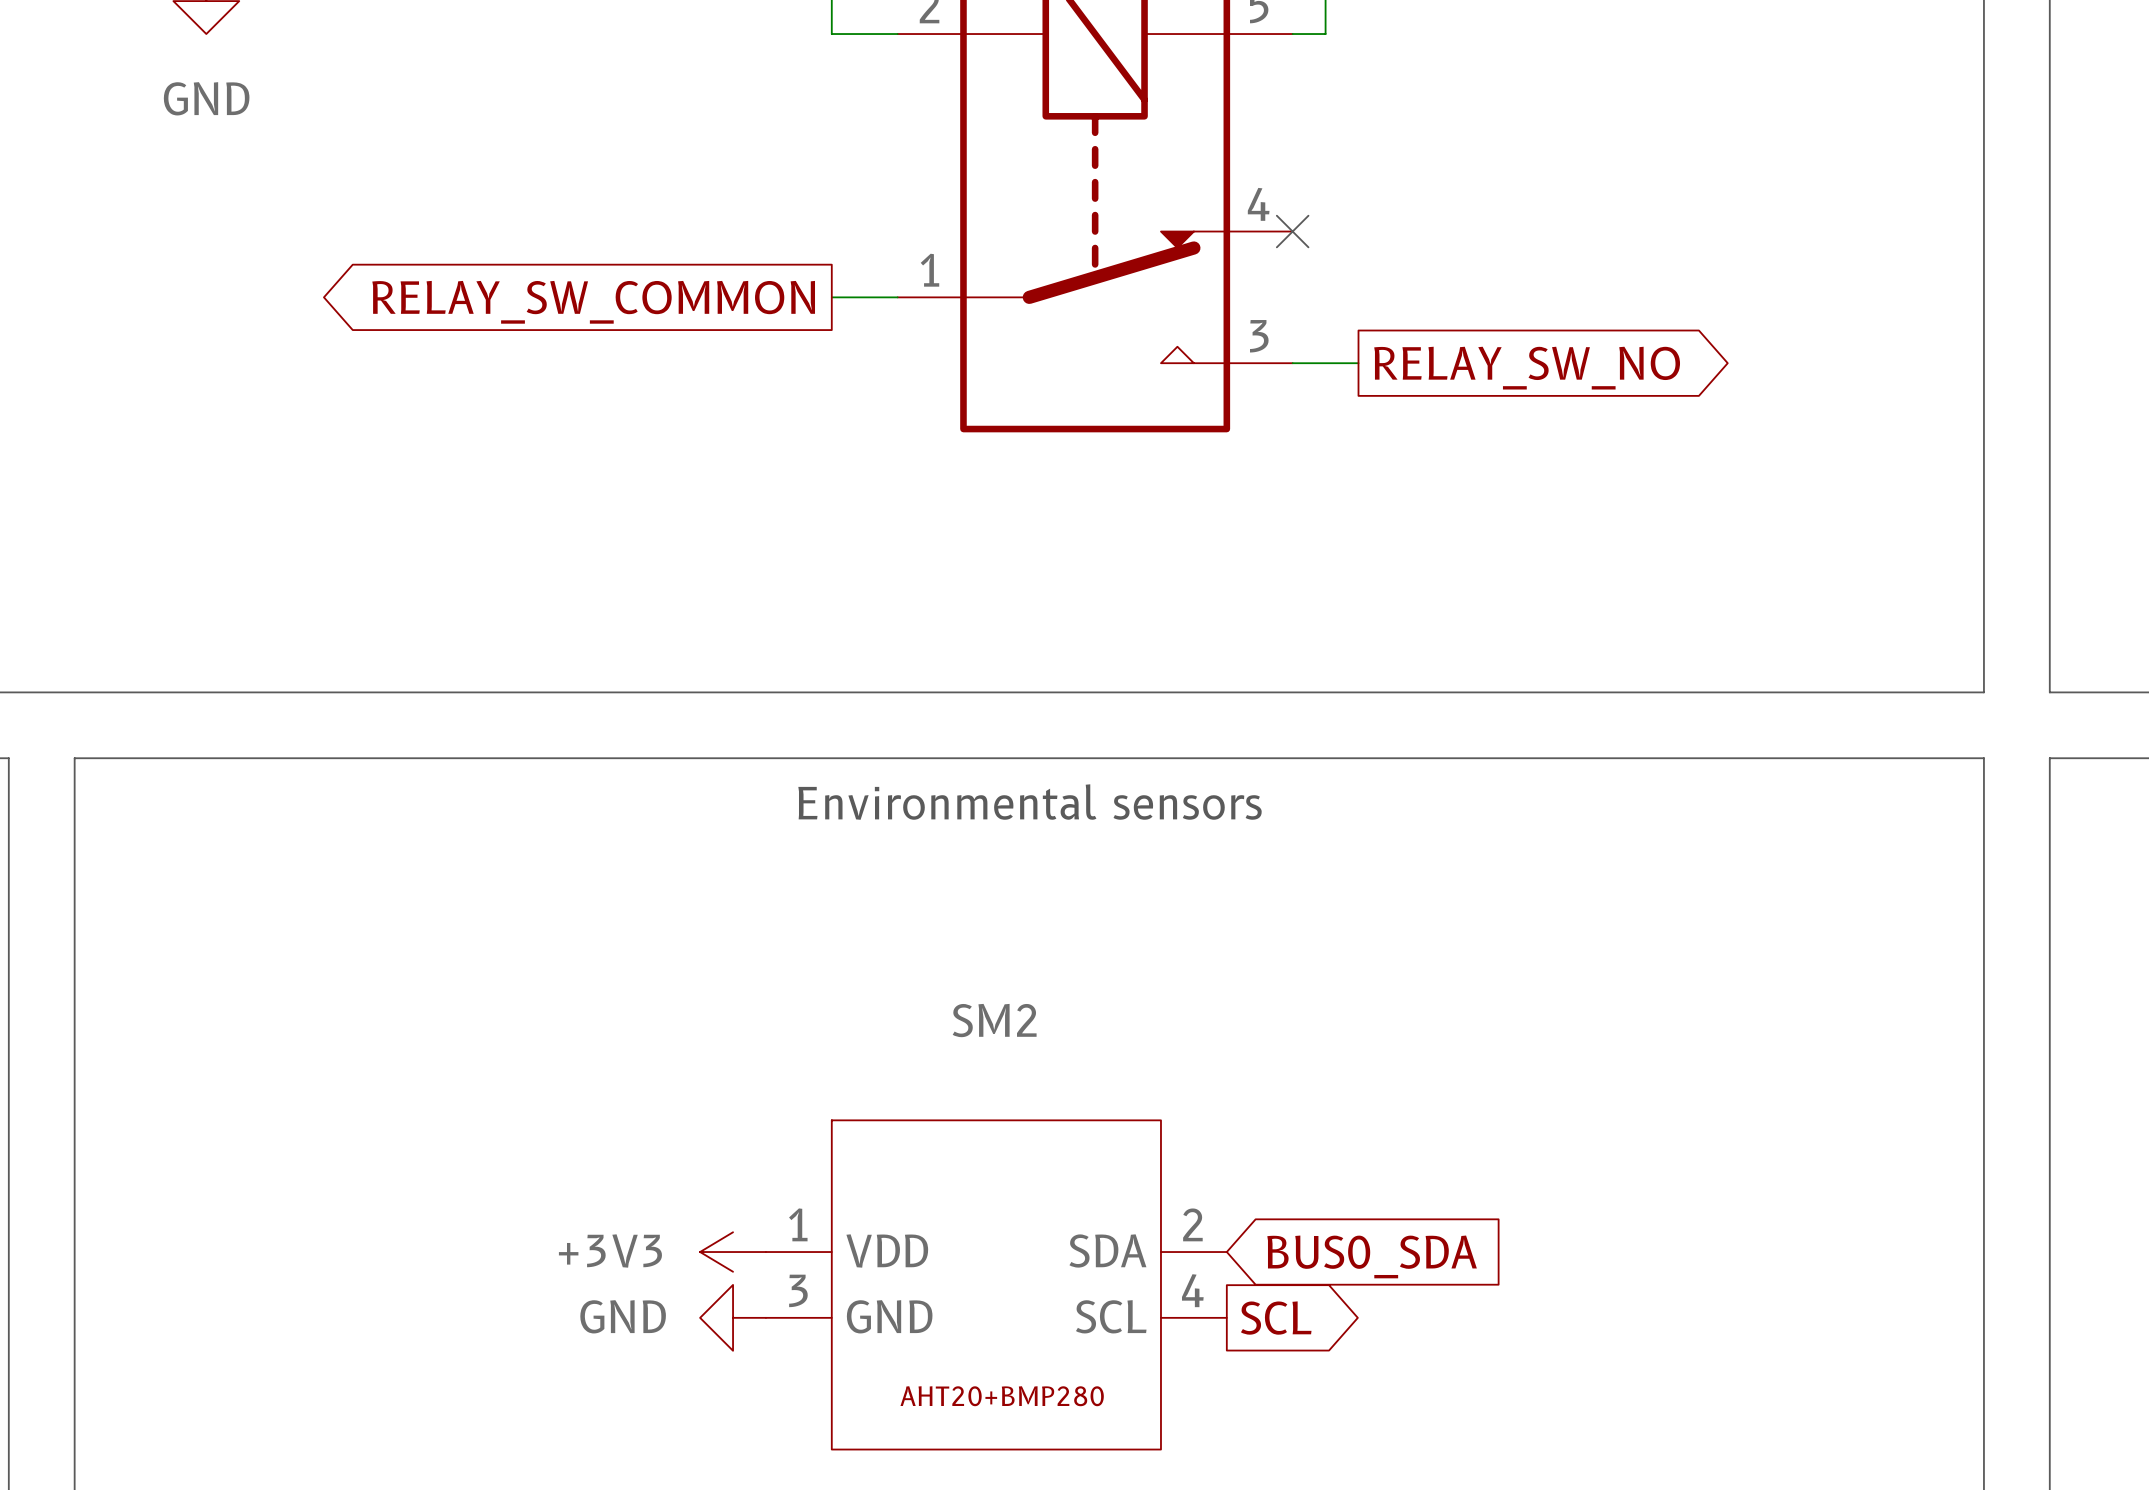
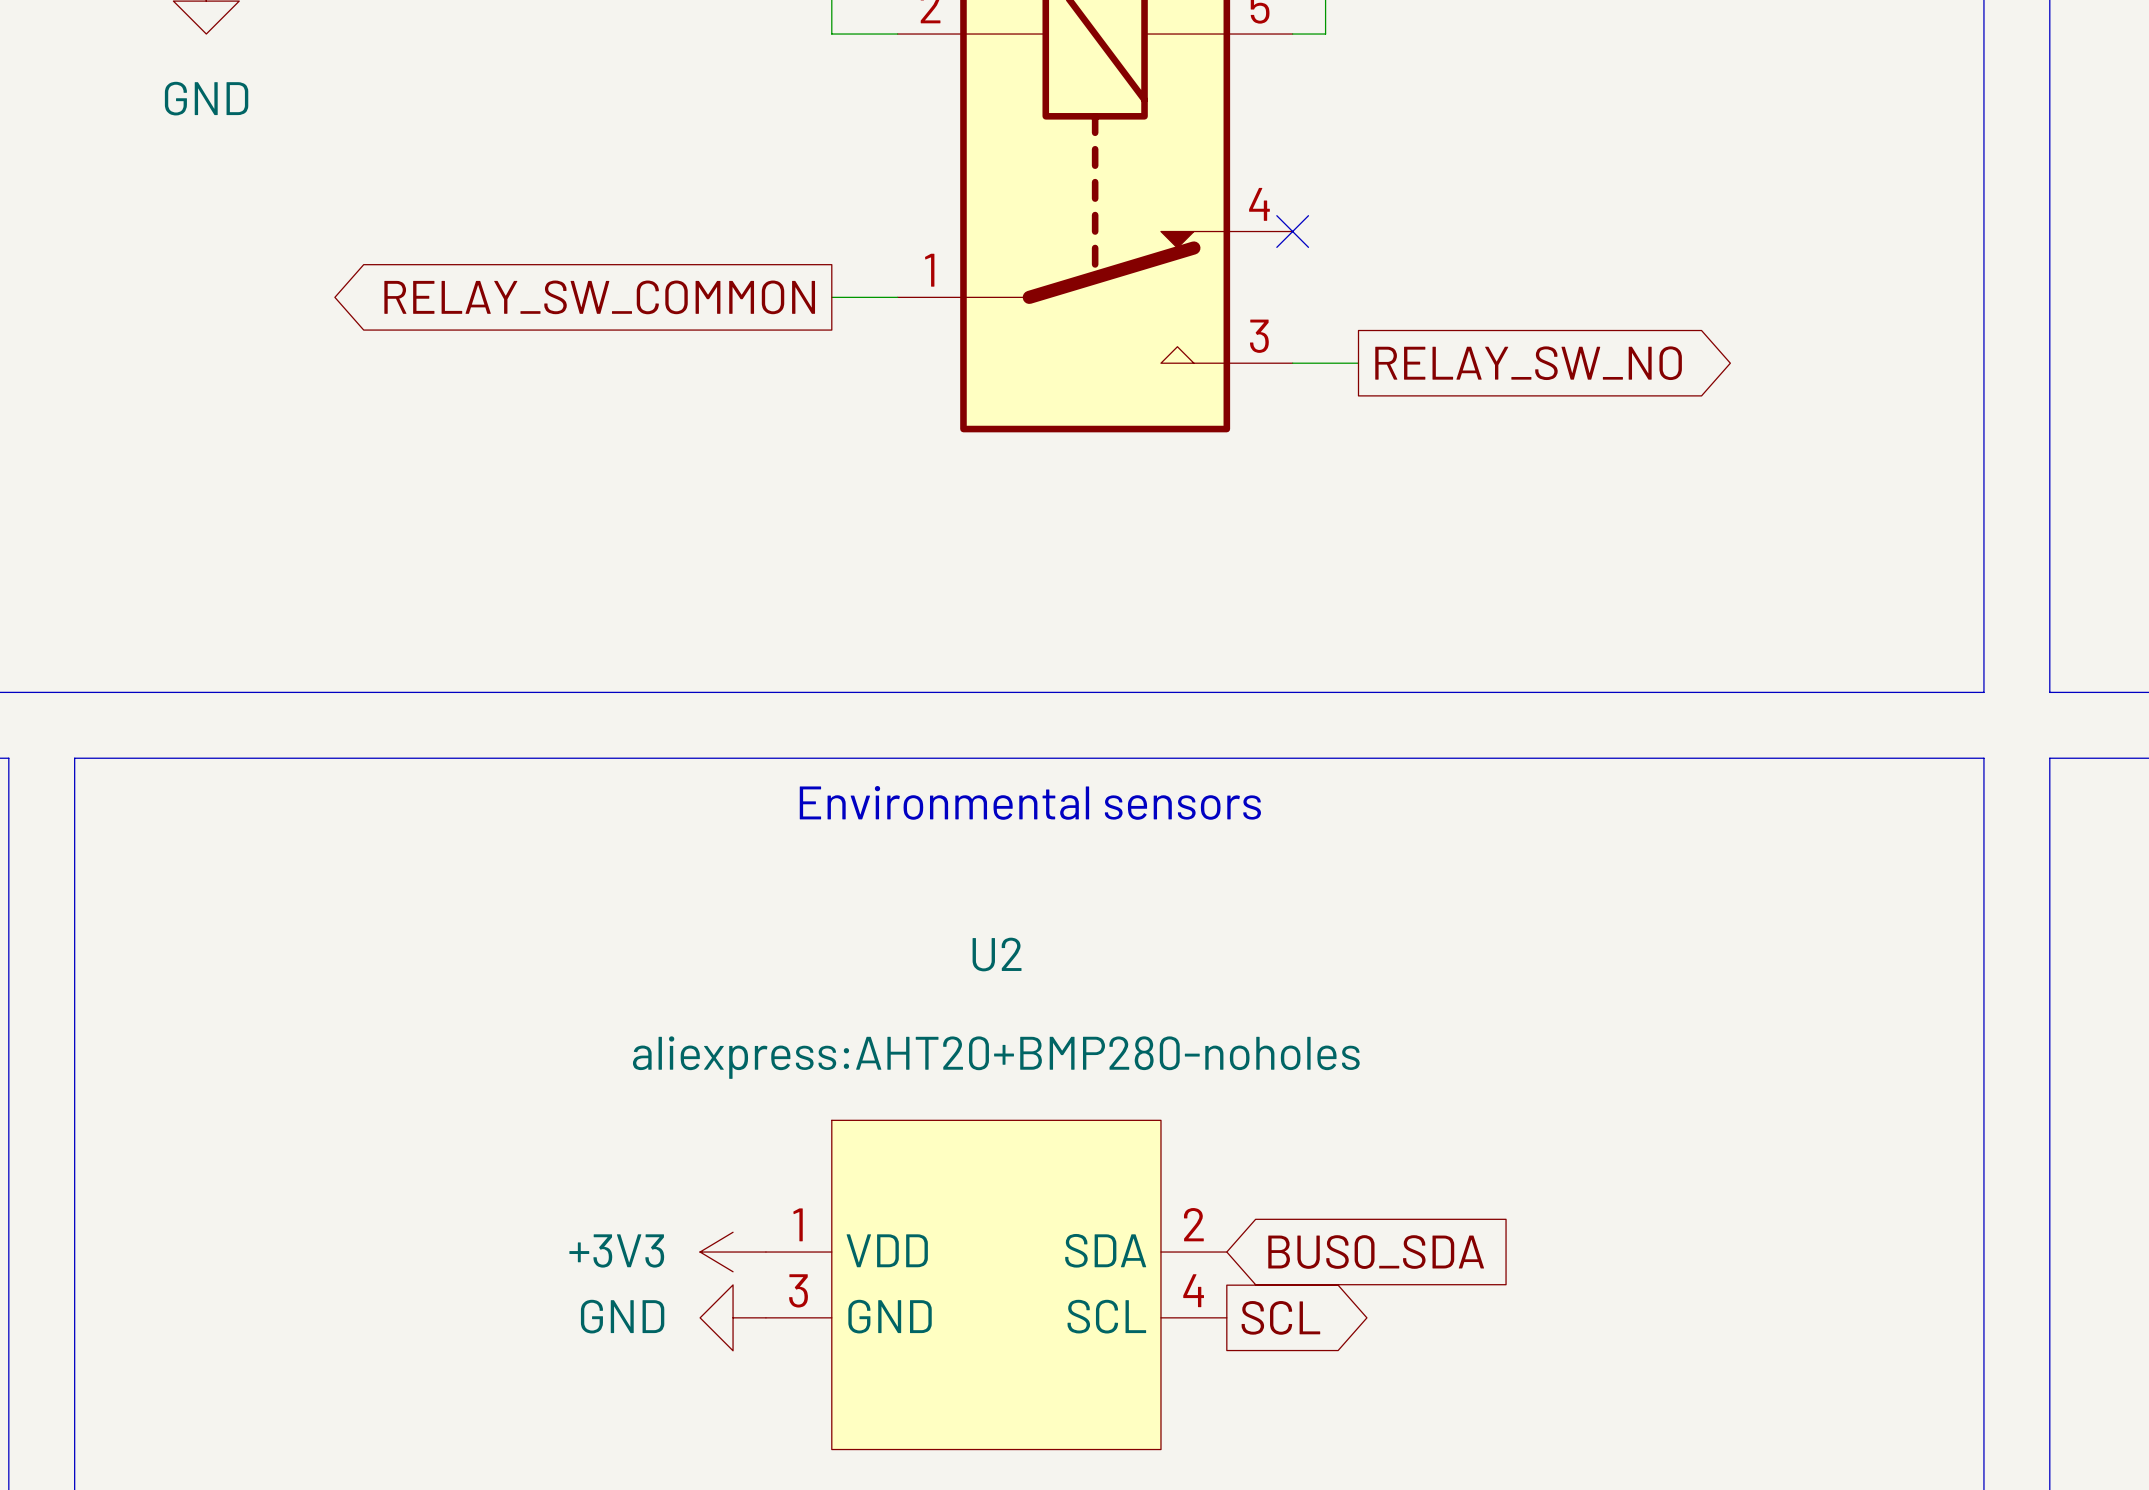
SM2 name: SM2 (994, 1020) -> U2 (997, 954)
SM2 text: none -> aliexpress:AHT20+BMP280-noholes (996, 1057)
SM2 text: AHT20+BMP280 (1002, 1396) -> none

